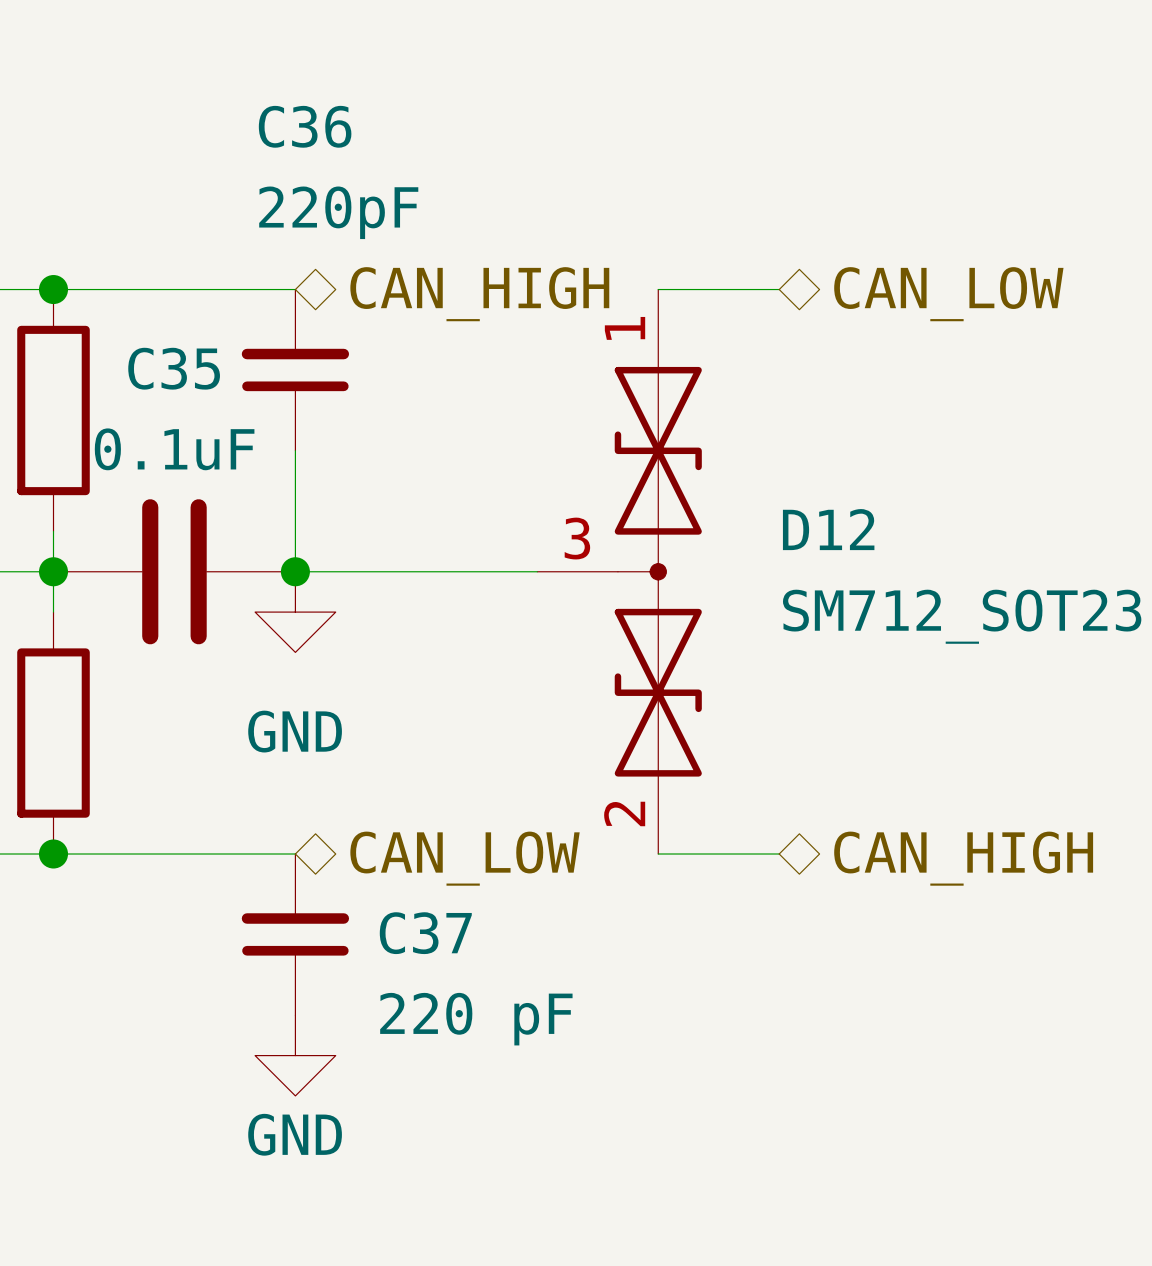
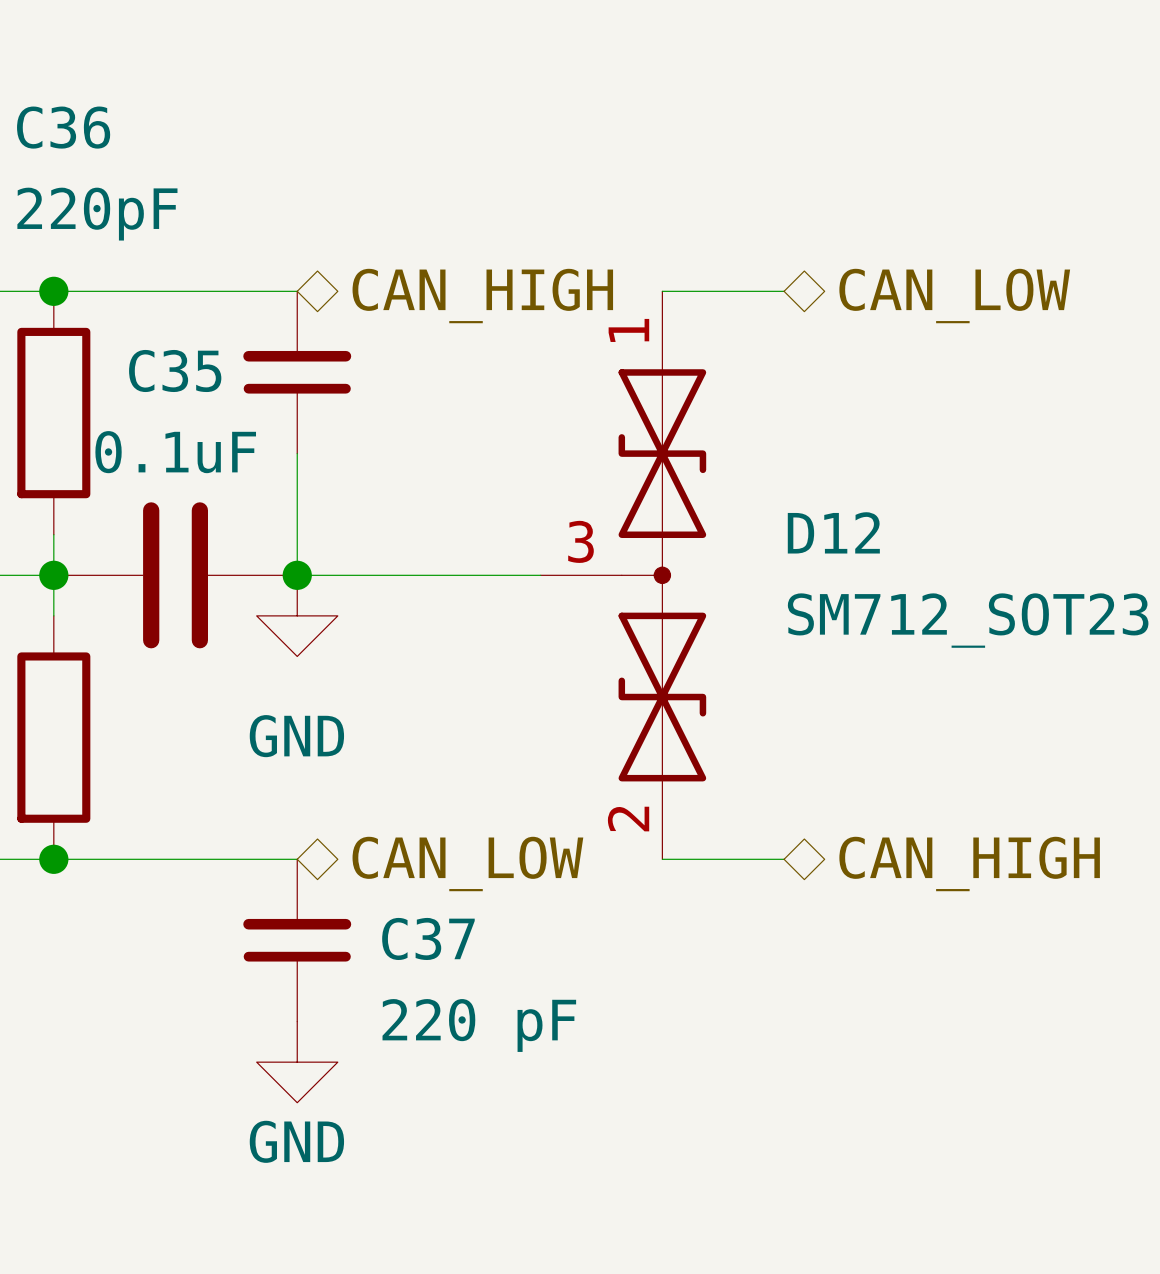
C36 name position: C36 (305, 126) -> C36 (63, 127)
C36 value position: 220pF (338, 212) -> 220pF (97, 214)

